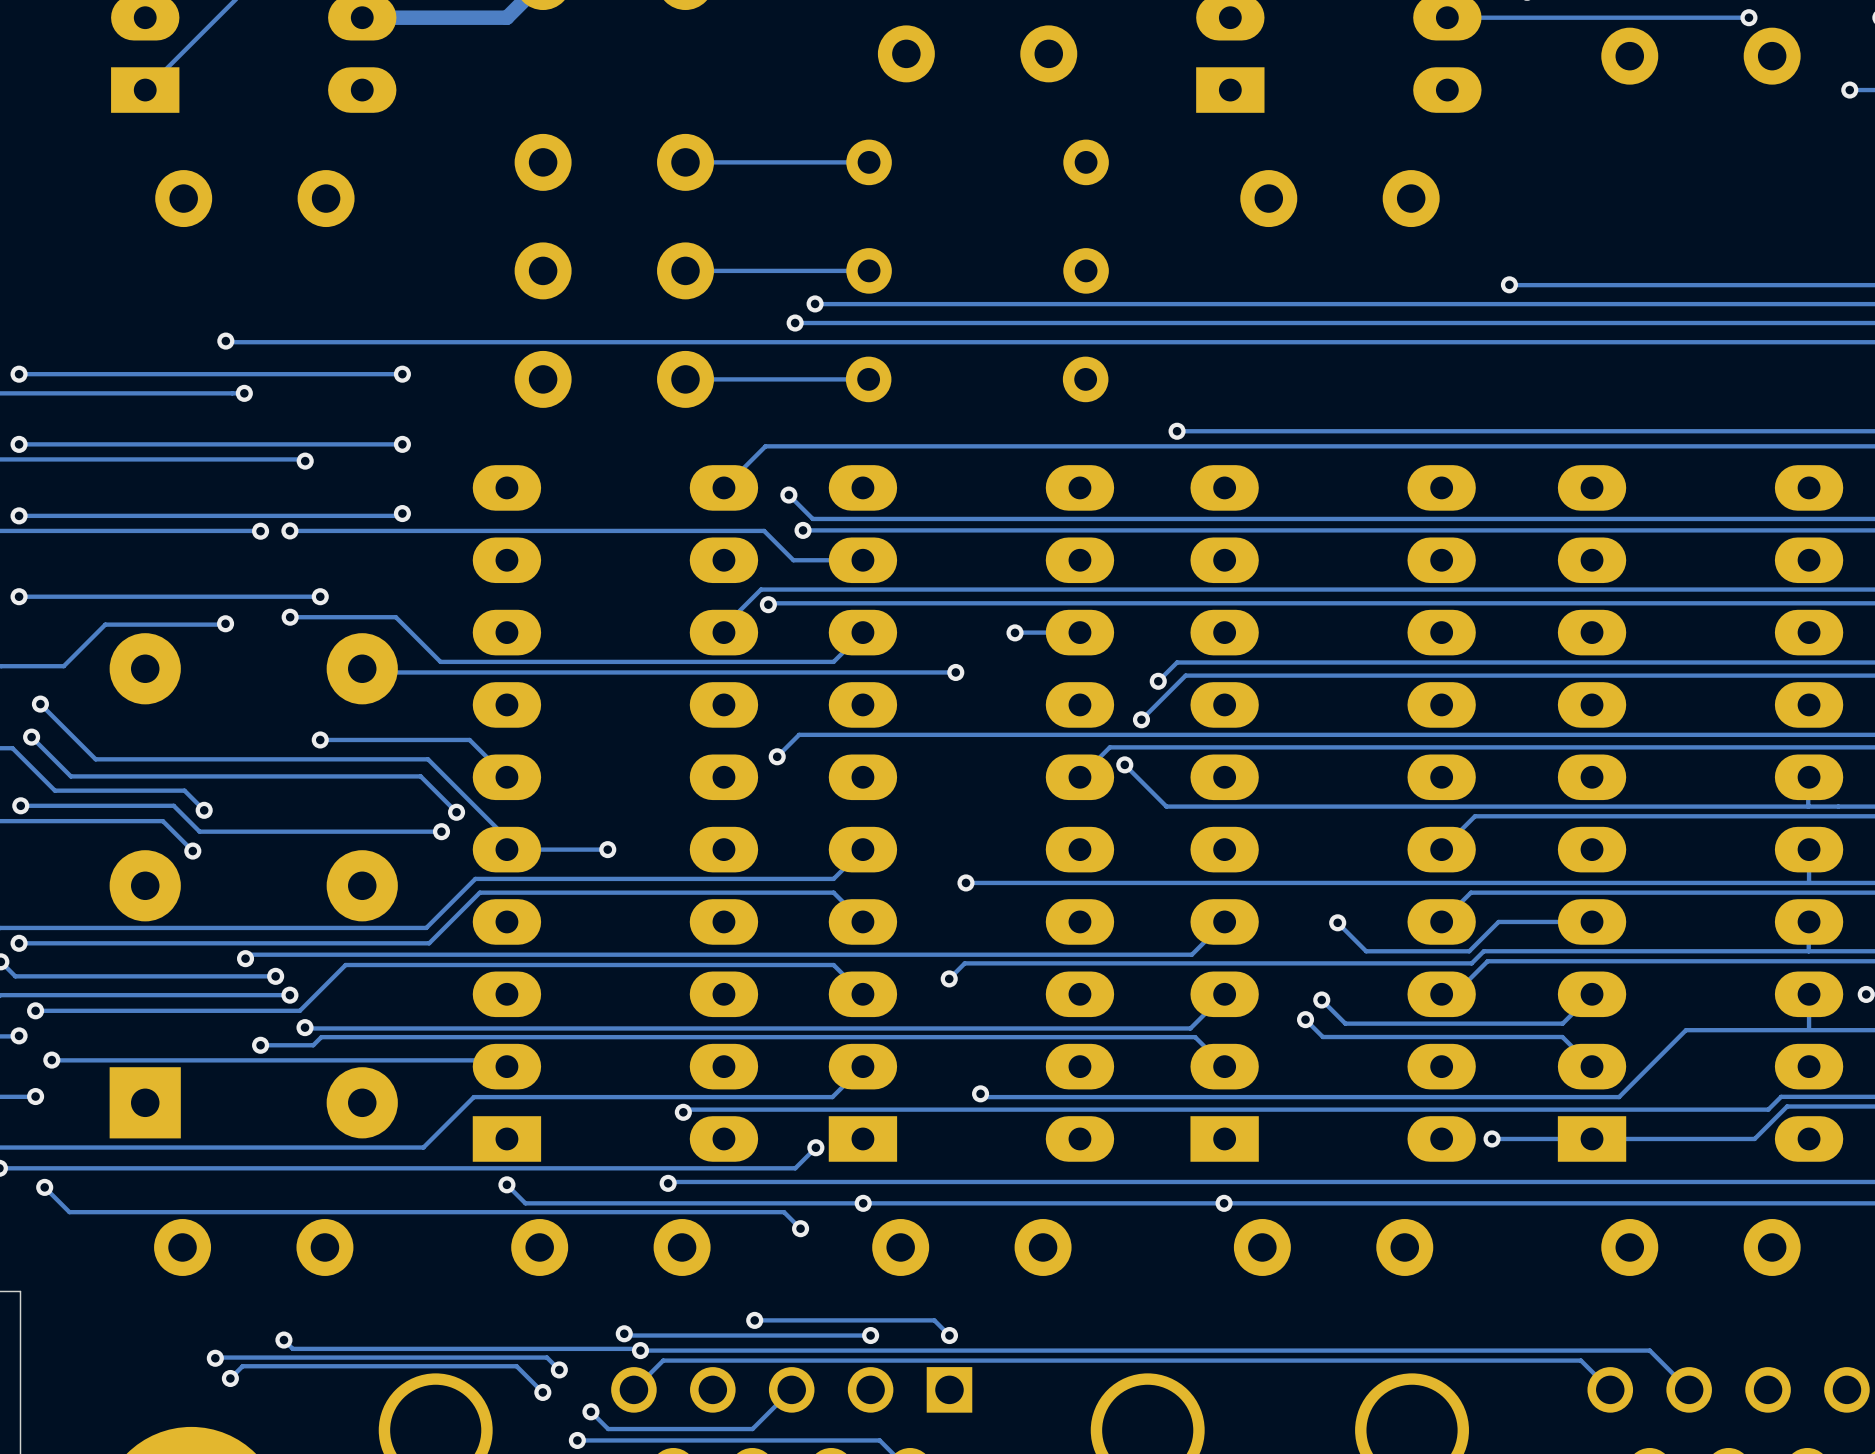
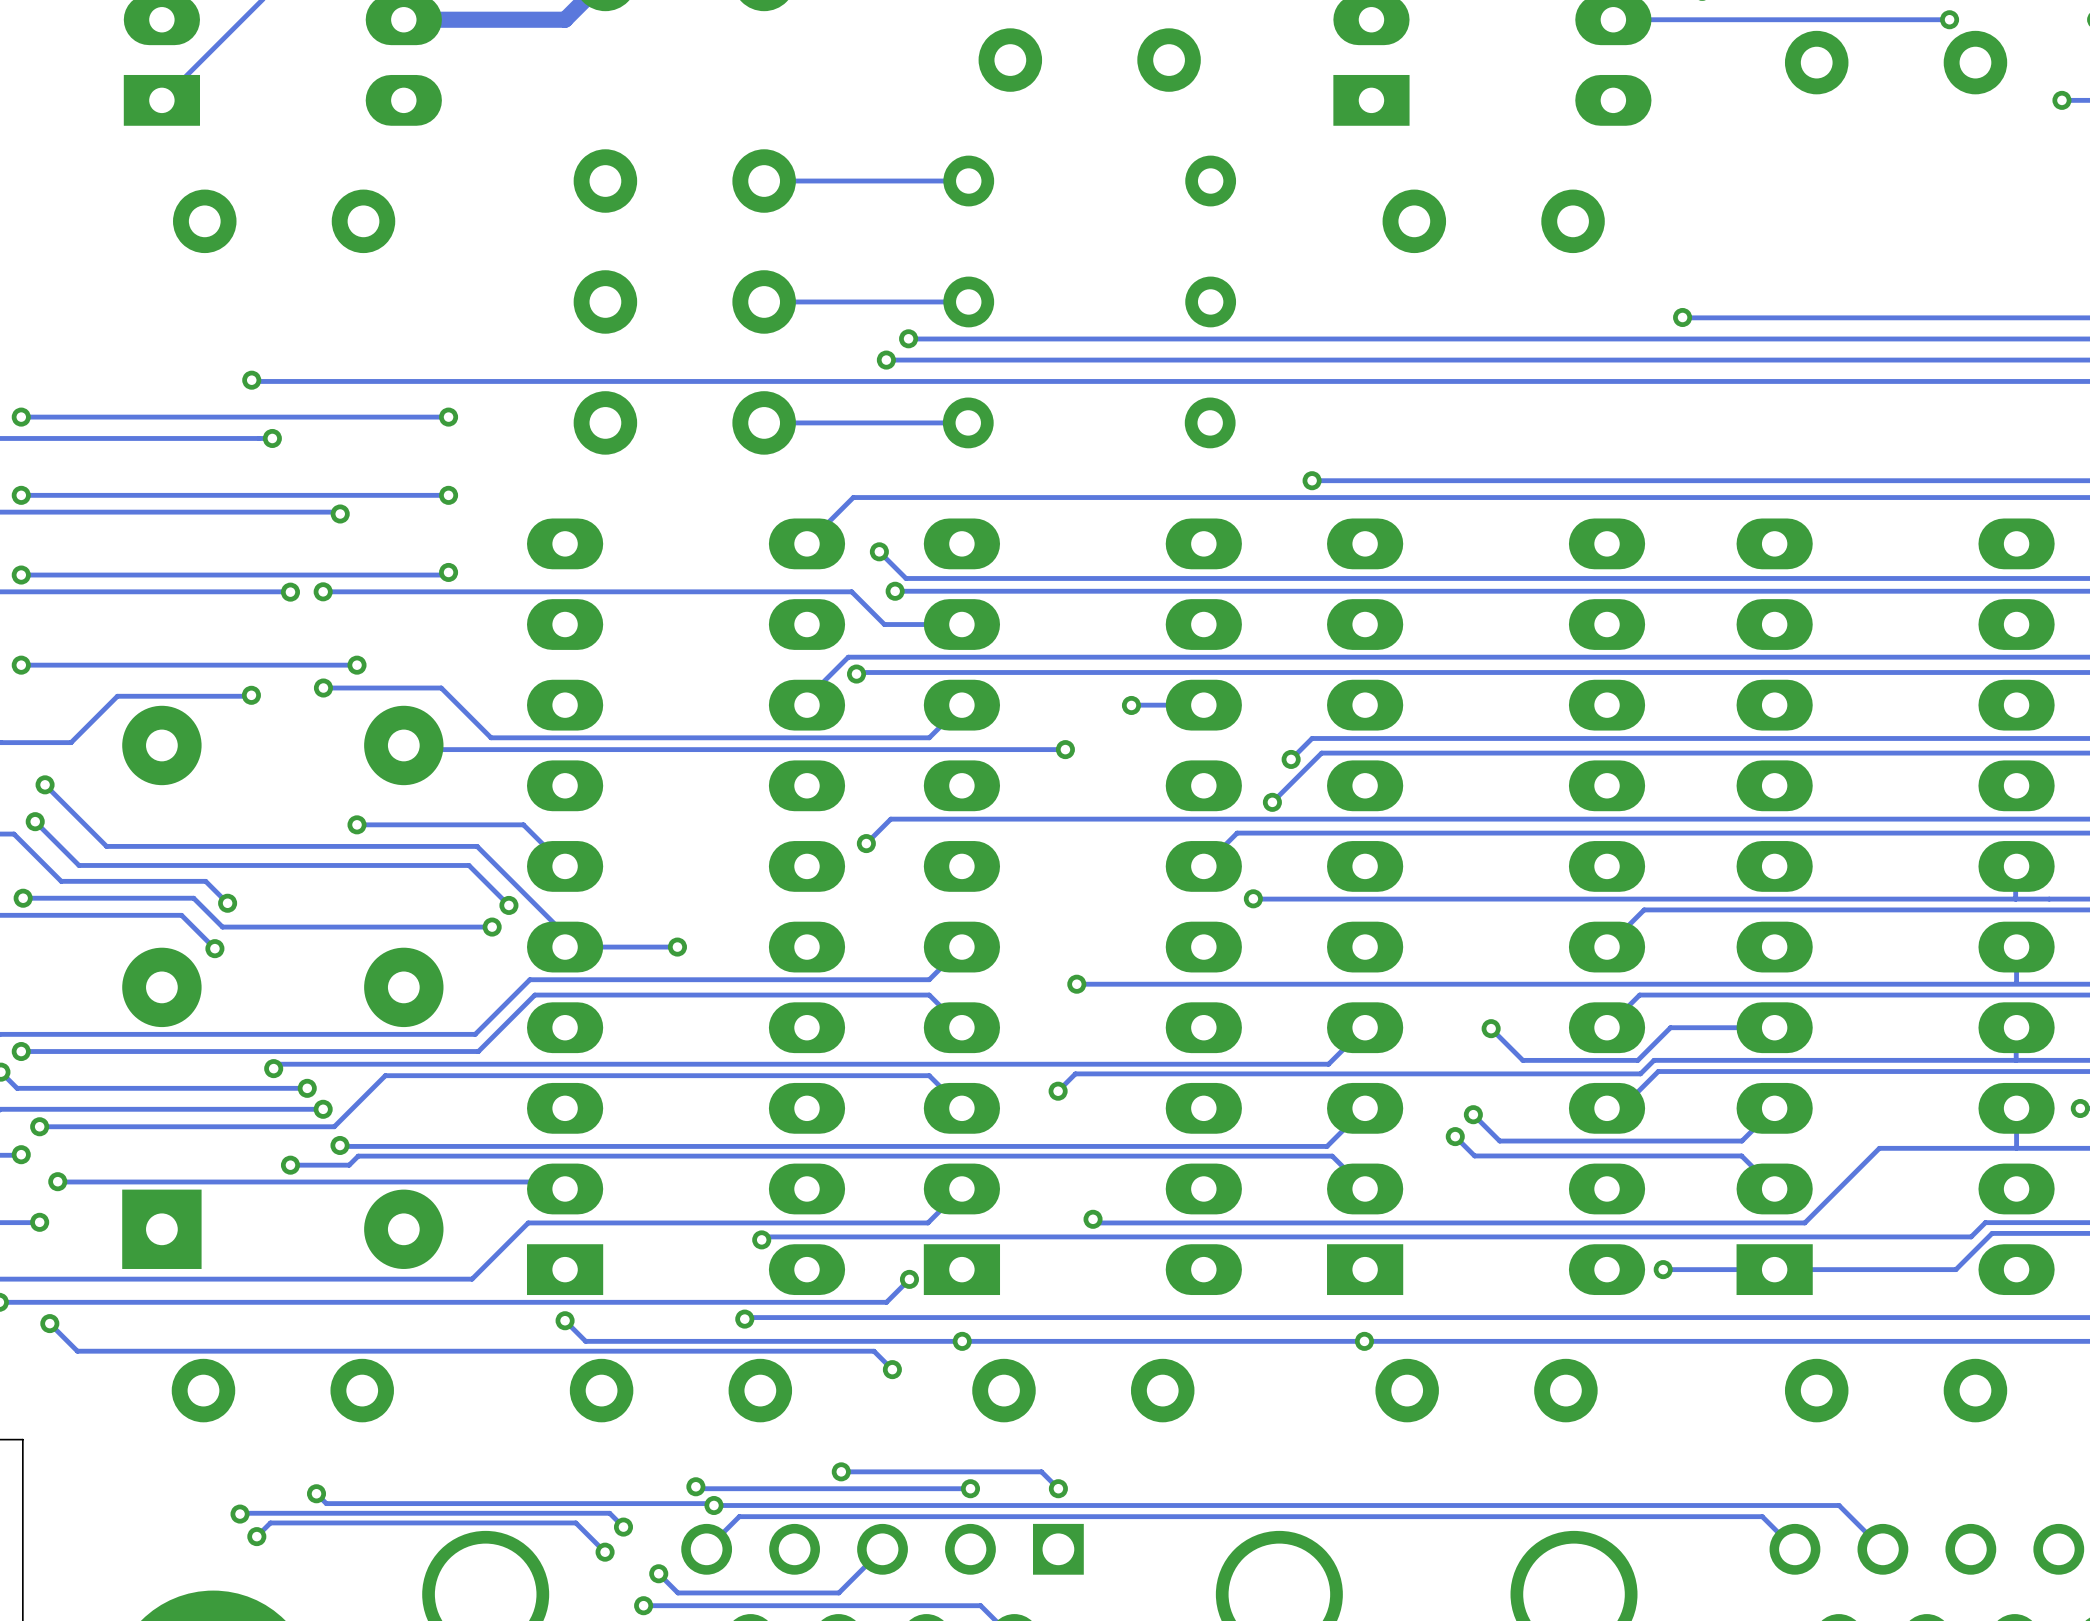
track: (1124, 764) (1166, 806) -> (1253, 899) (1300, 899)
via position: (1124, 764) -> (1253, 898)

